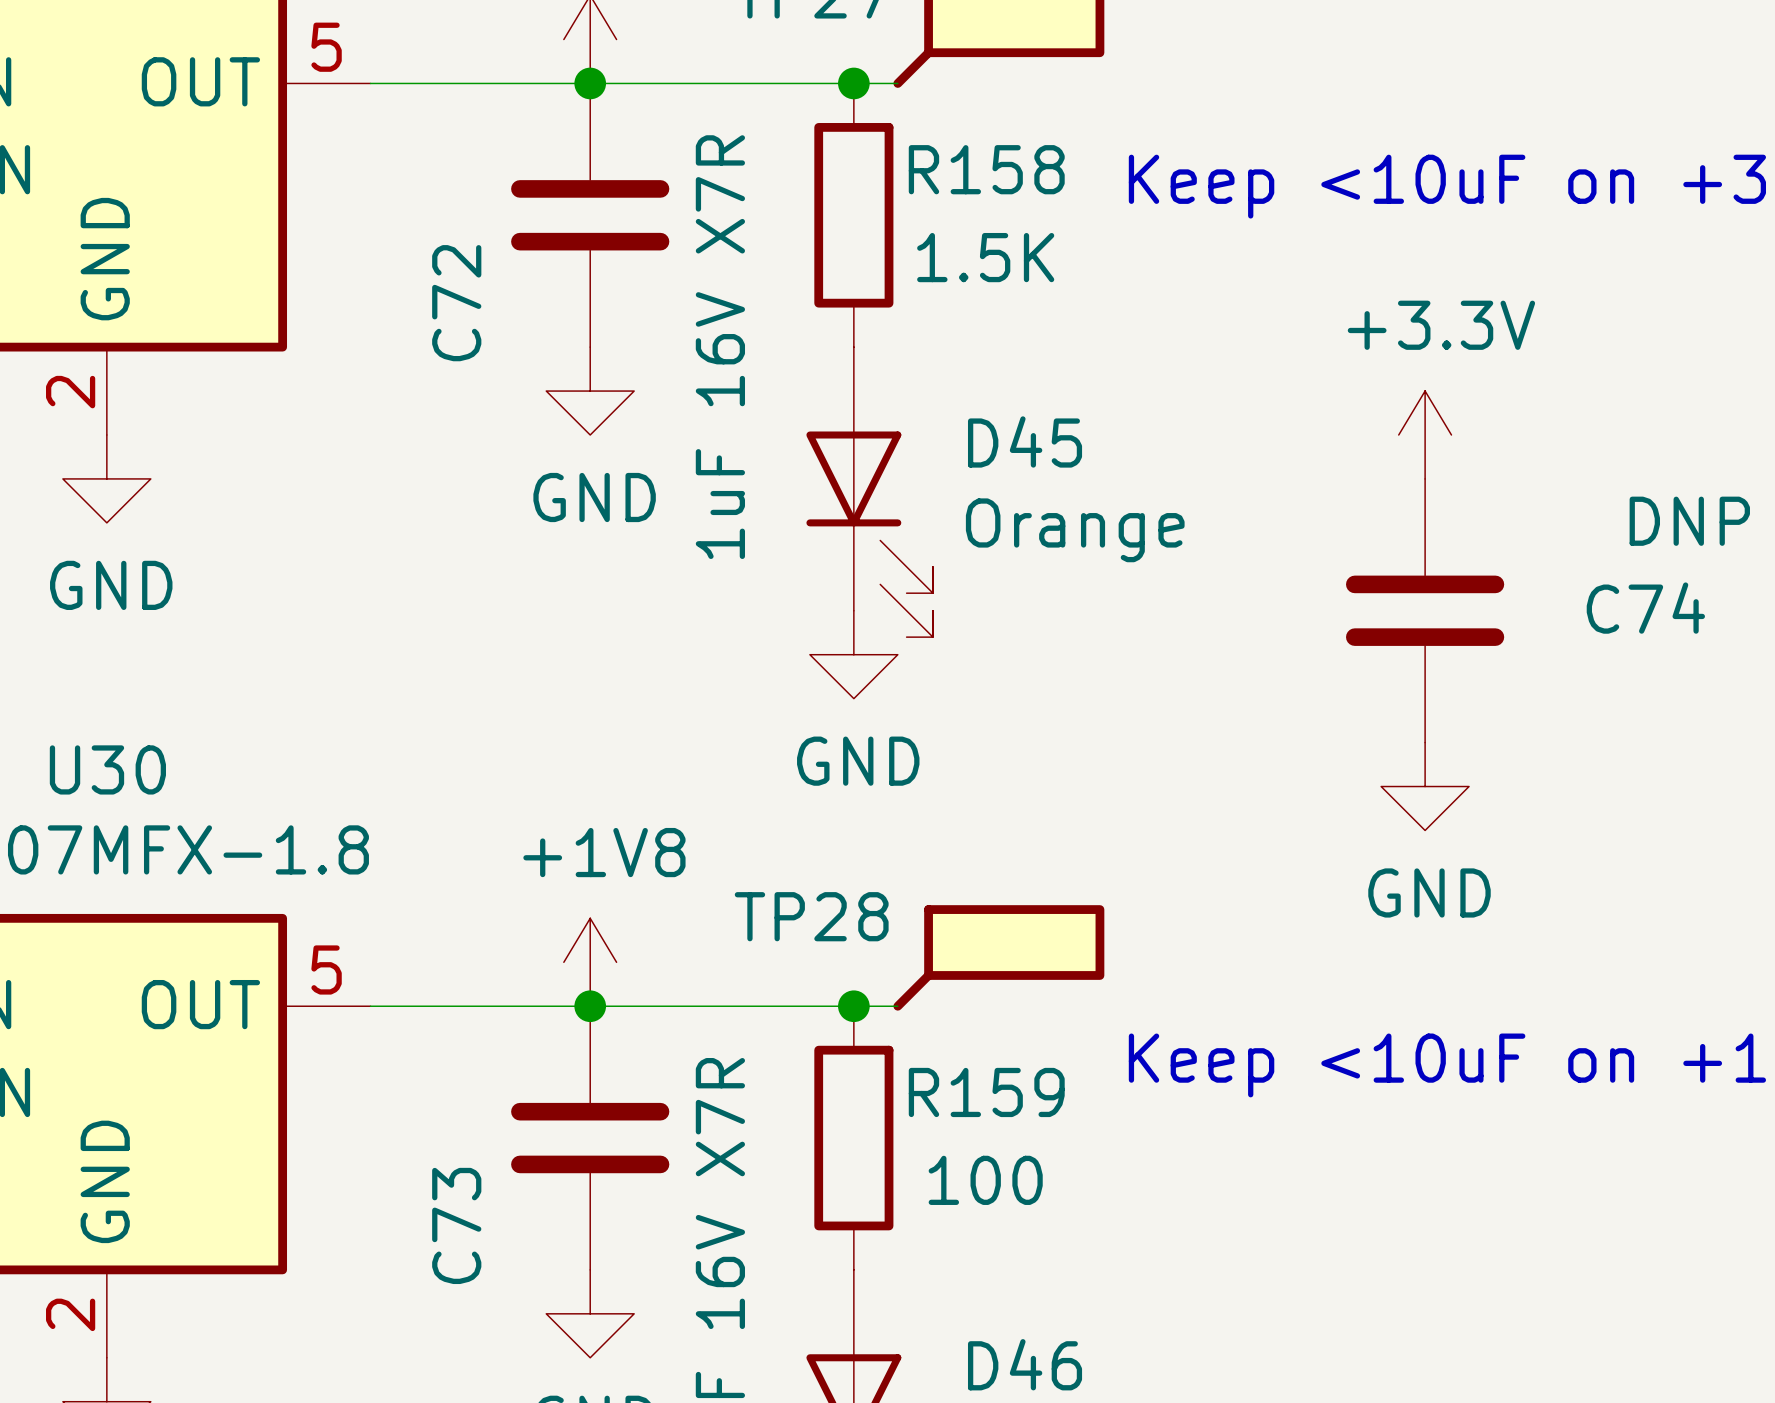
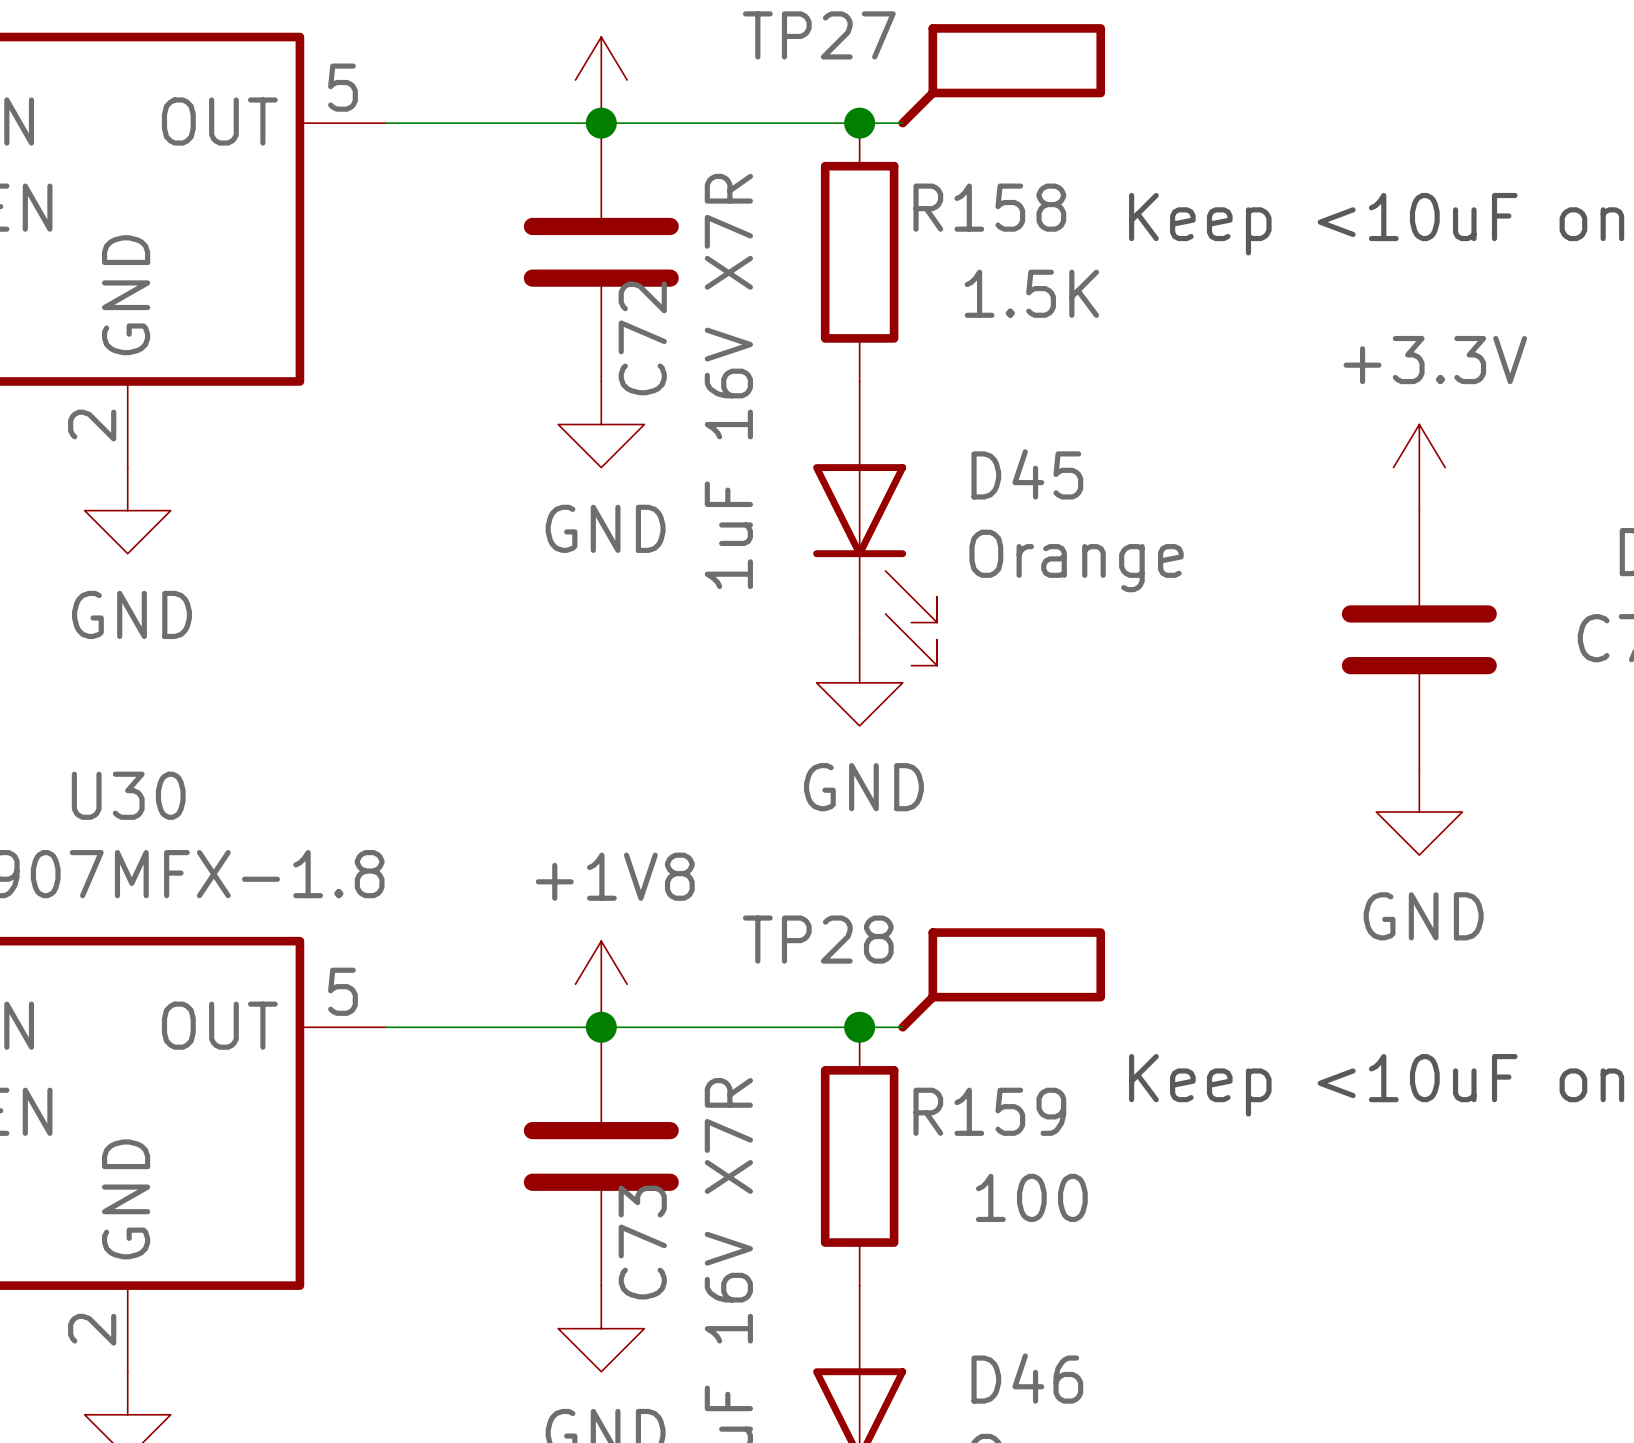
R158 value position: 1.5K (985, 257) -> 1.5K (1031, 293)
C72 name position: C72 (456, 303) -> C72 (642, 338)
R159 value position: 100 (985, 1180) -> 100 (1031, 1197)
C73 name position: C73 (456, 1225) -> C73 (642, 1242)

